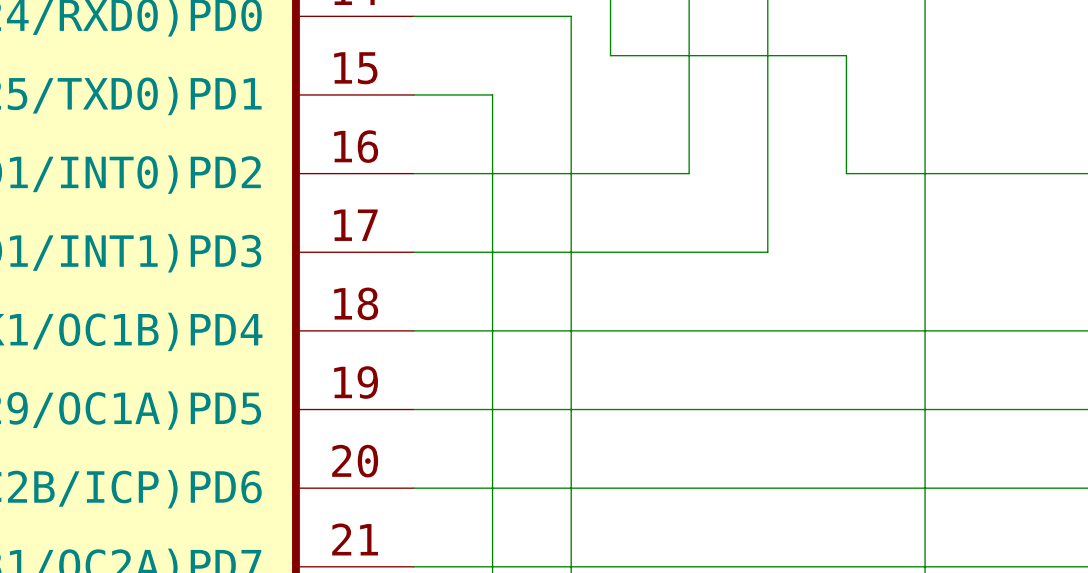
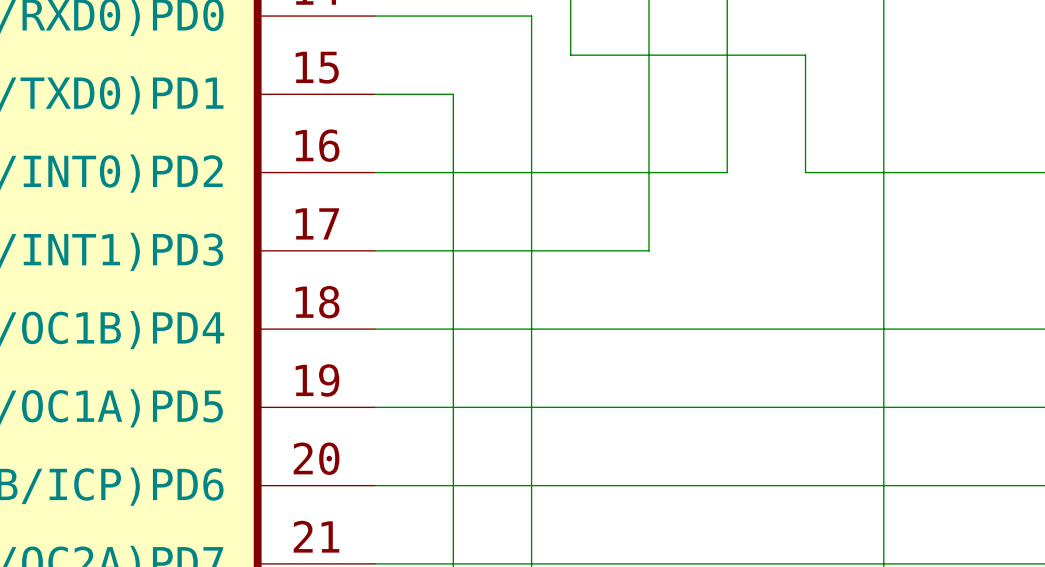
wire: (767, 173) (767, 252) (689, 252) -> (727, 172) (648, 172) (648, 250)

